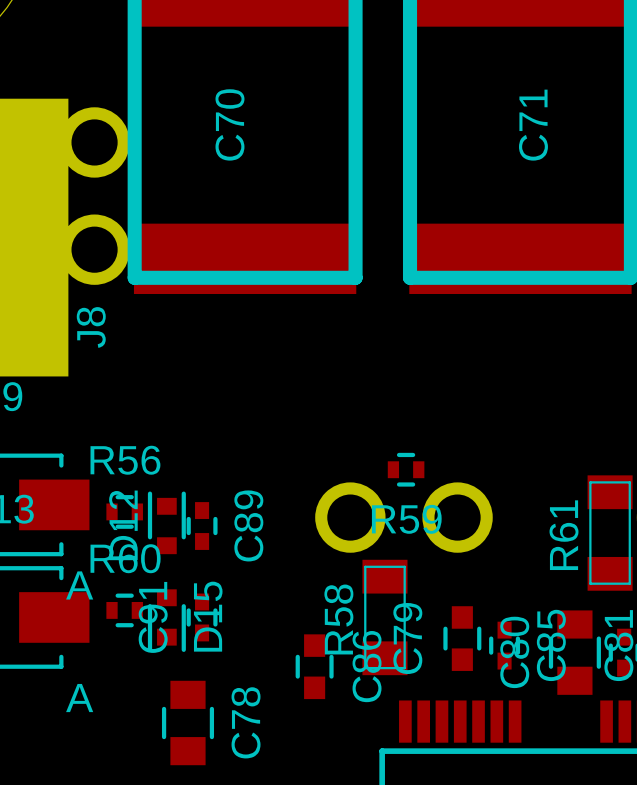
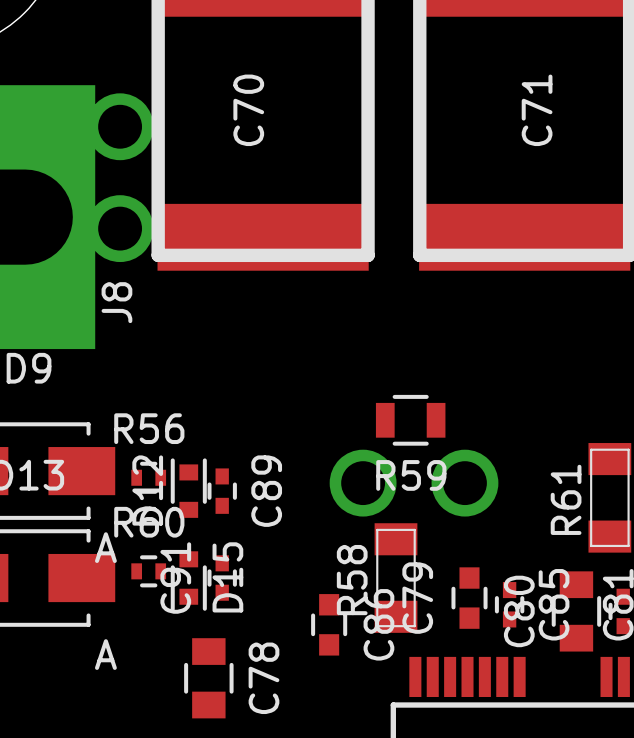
R59 footprint: [387, 452, 425, 487] -> [375, 394, 446, 446]

